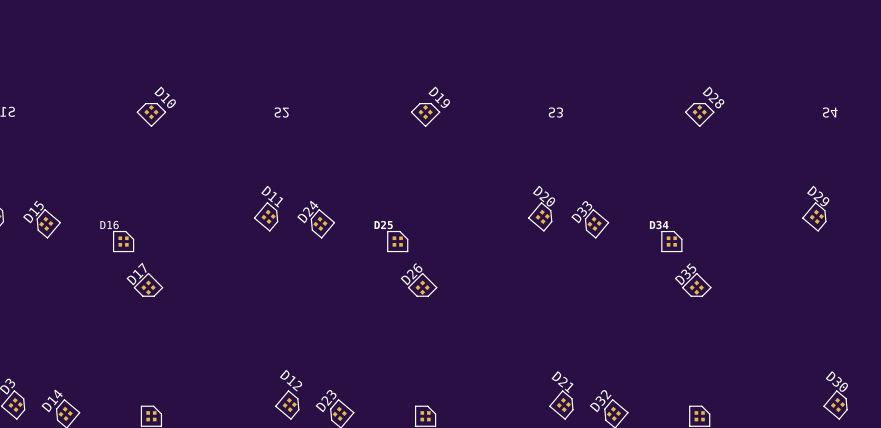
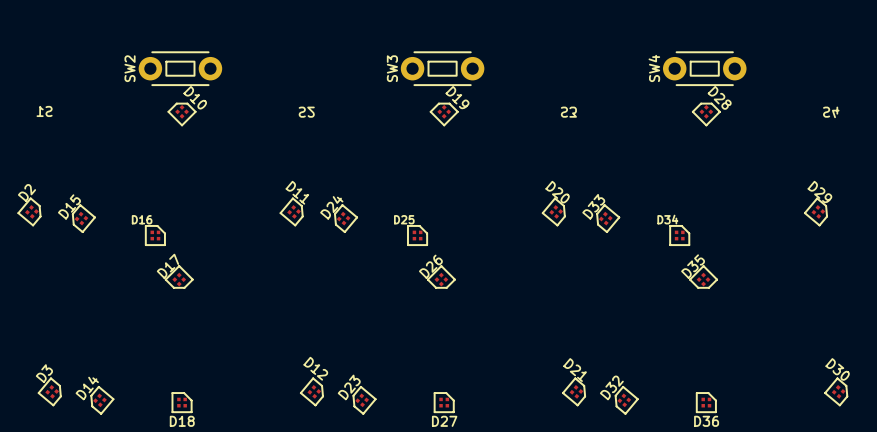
SW2: none -> (180, 68)
SW3: none -> (442, 68)
SW4: none -> (704, 68)

